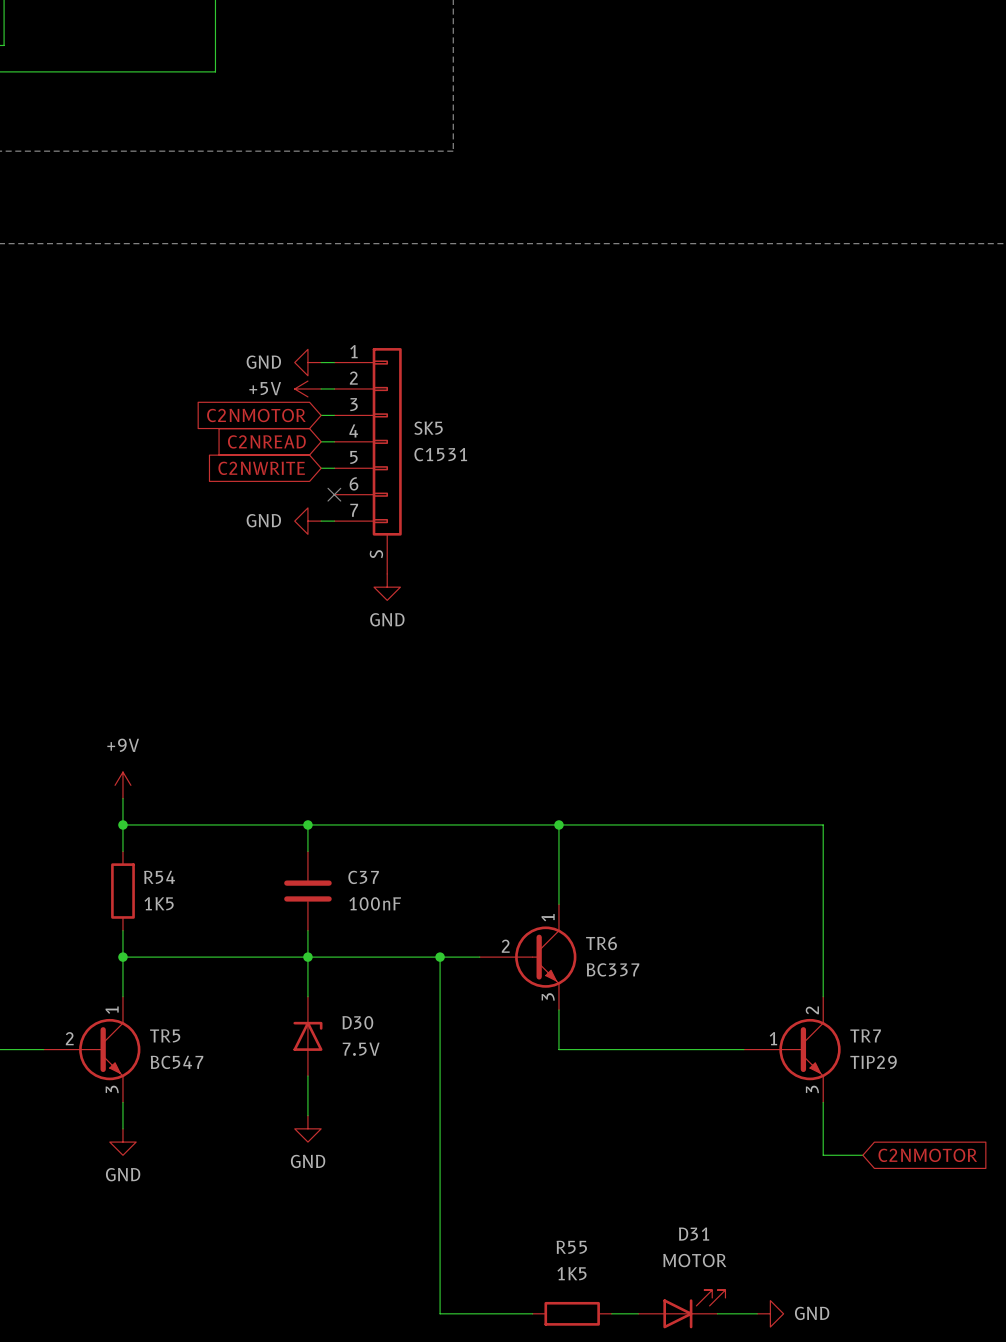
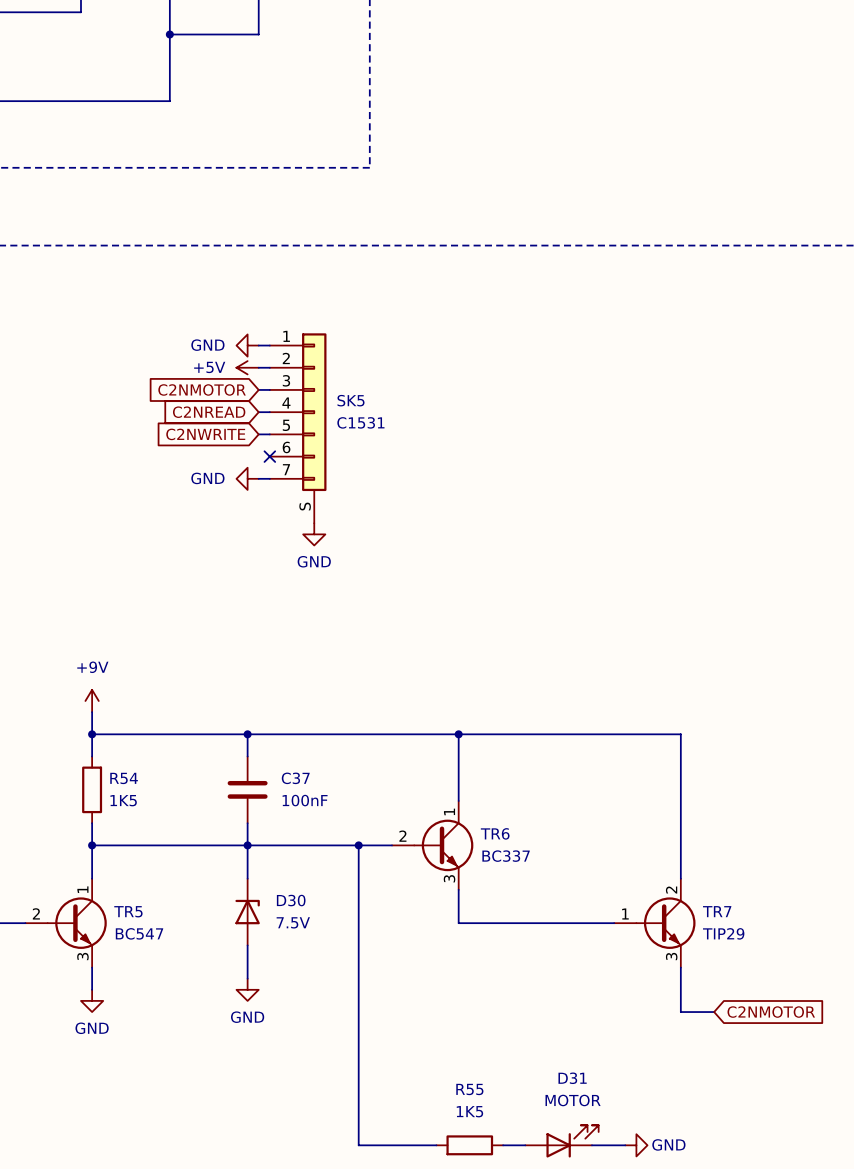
TR6 symbol: [479, 904, 577, 1010] -> [392, 800, 474, 890]
TR5 symbol: [43, 996, 141, 1103] -> [25, 878, 107, 968]
TR7 symbol: [743, 996, 841, 1103] -> [614, 878, 696, 968]

